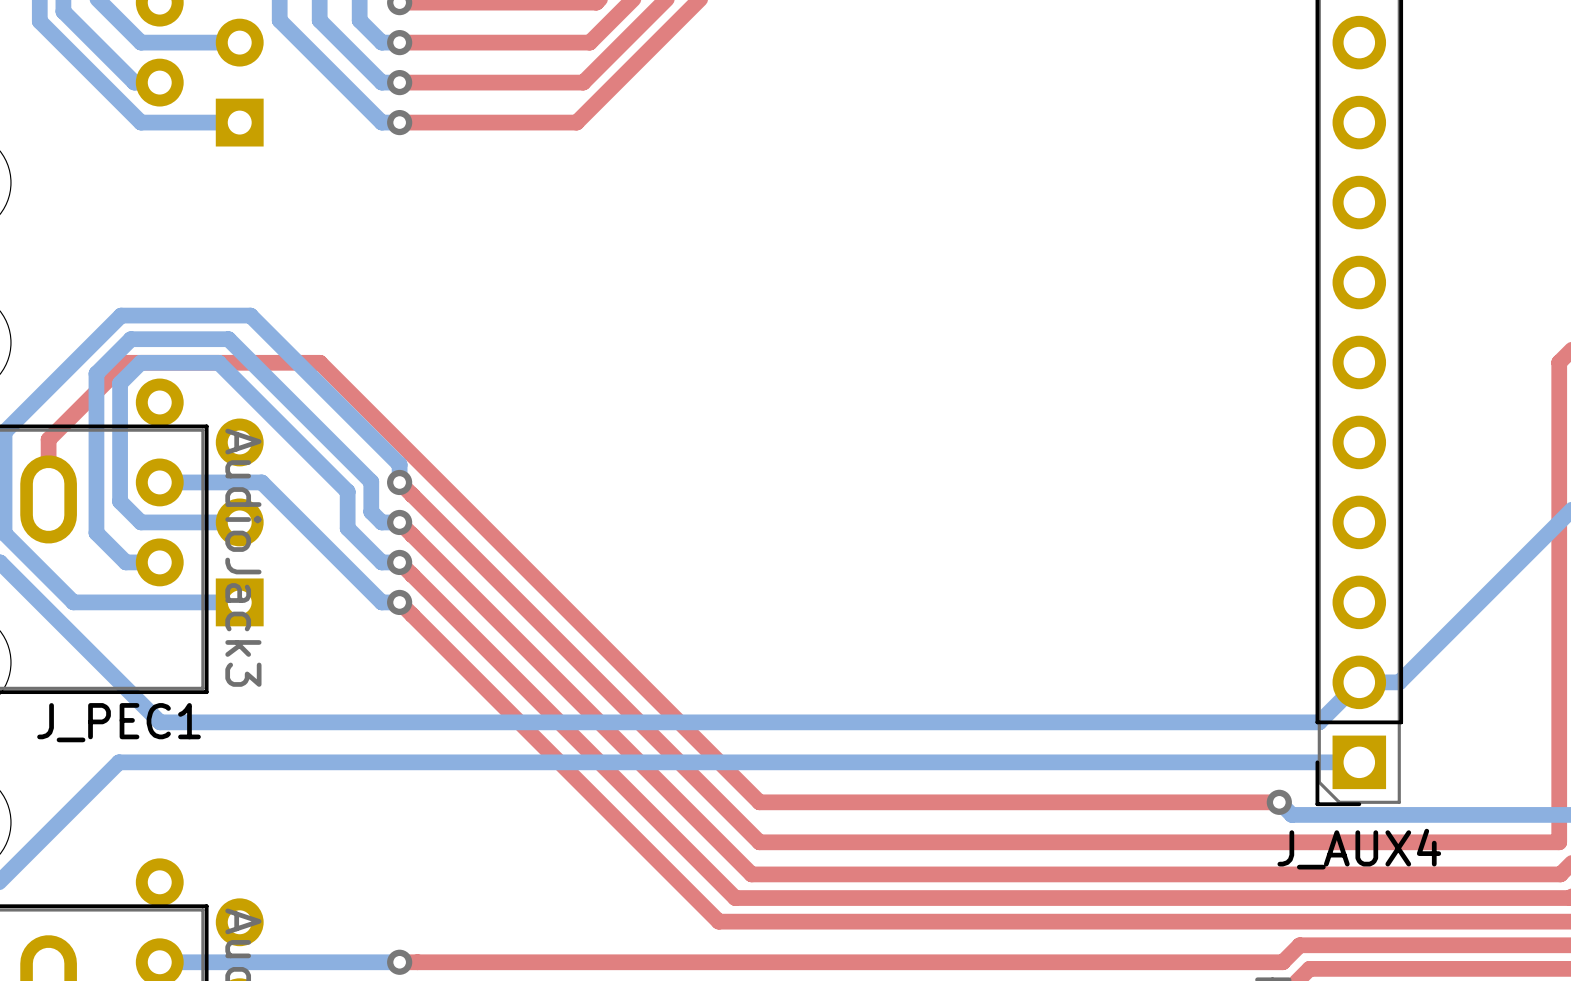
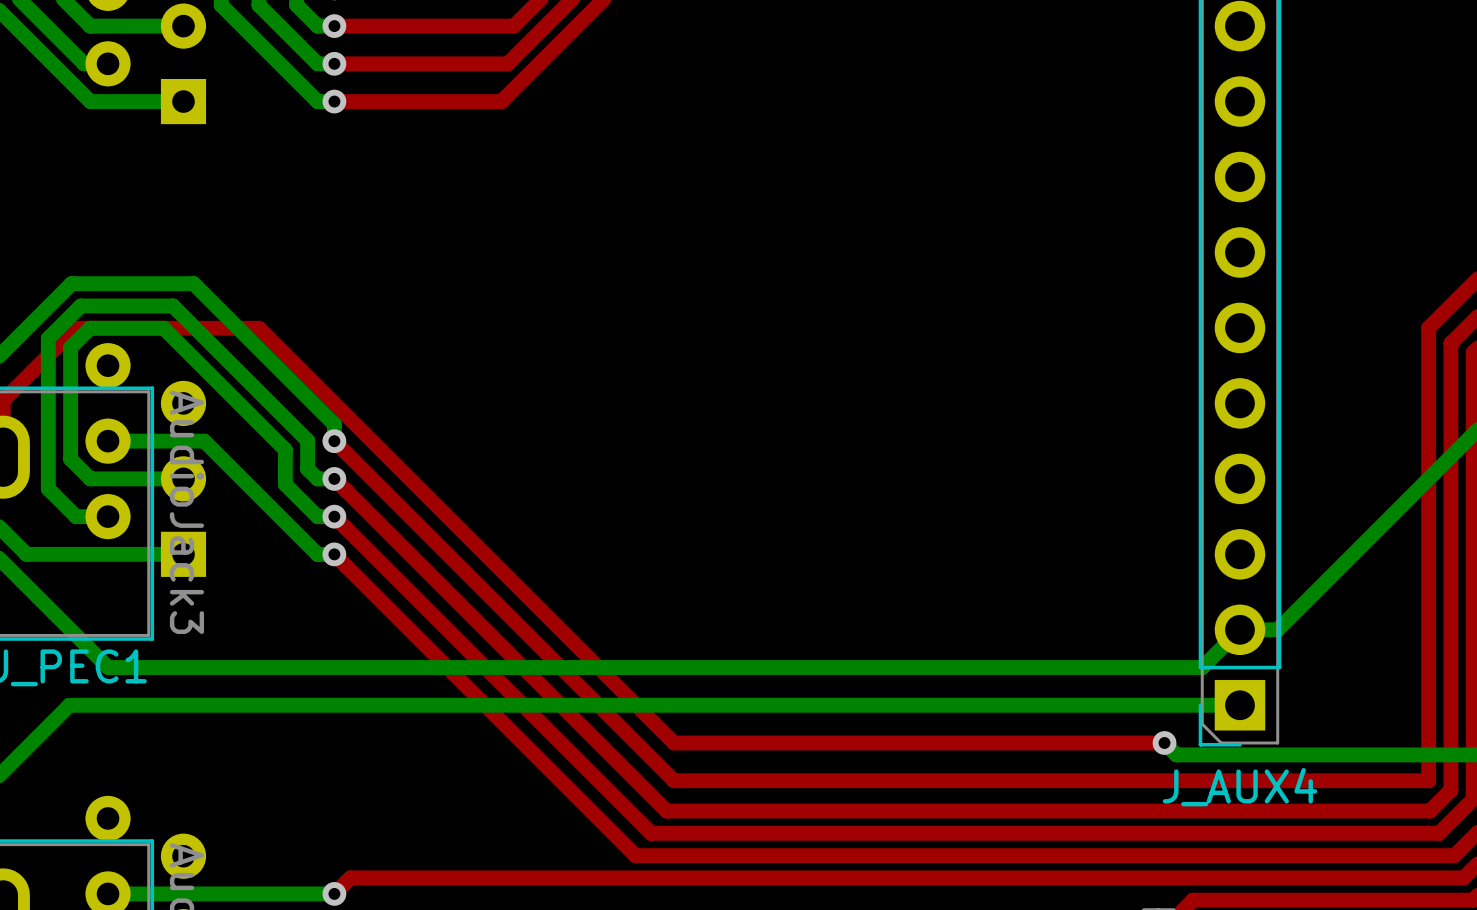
top track: (1299, 945) (1282, 962) (399, 962) -> (1183, 877) (350, 877) (334, 893)

